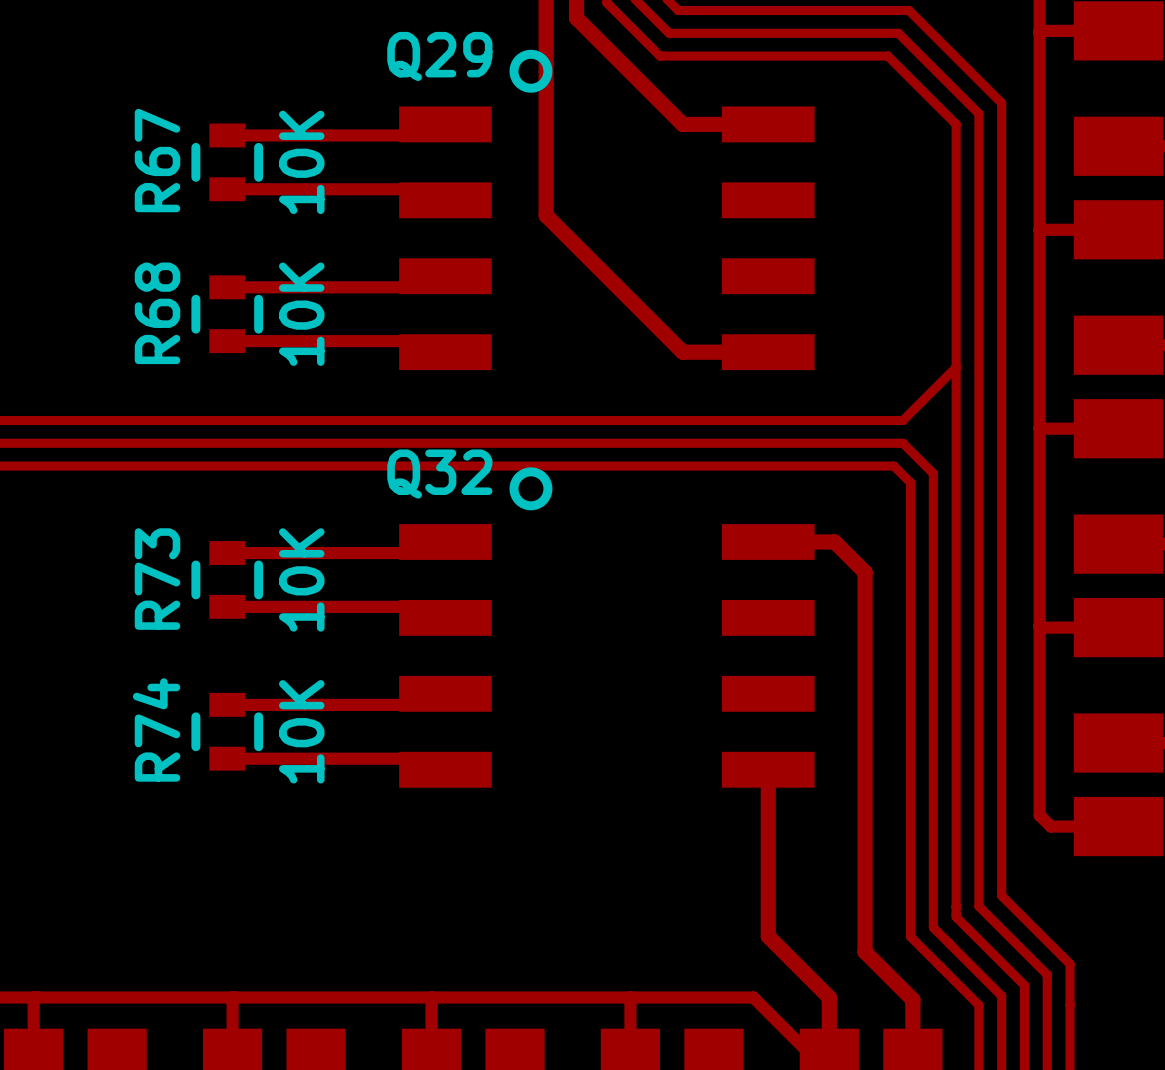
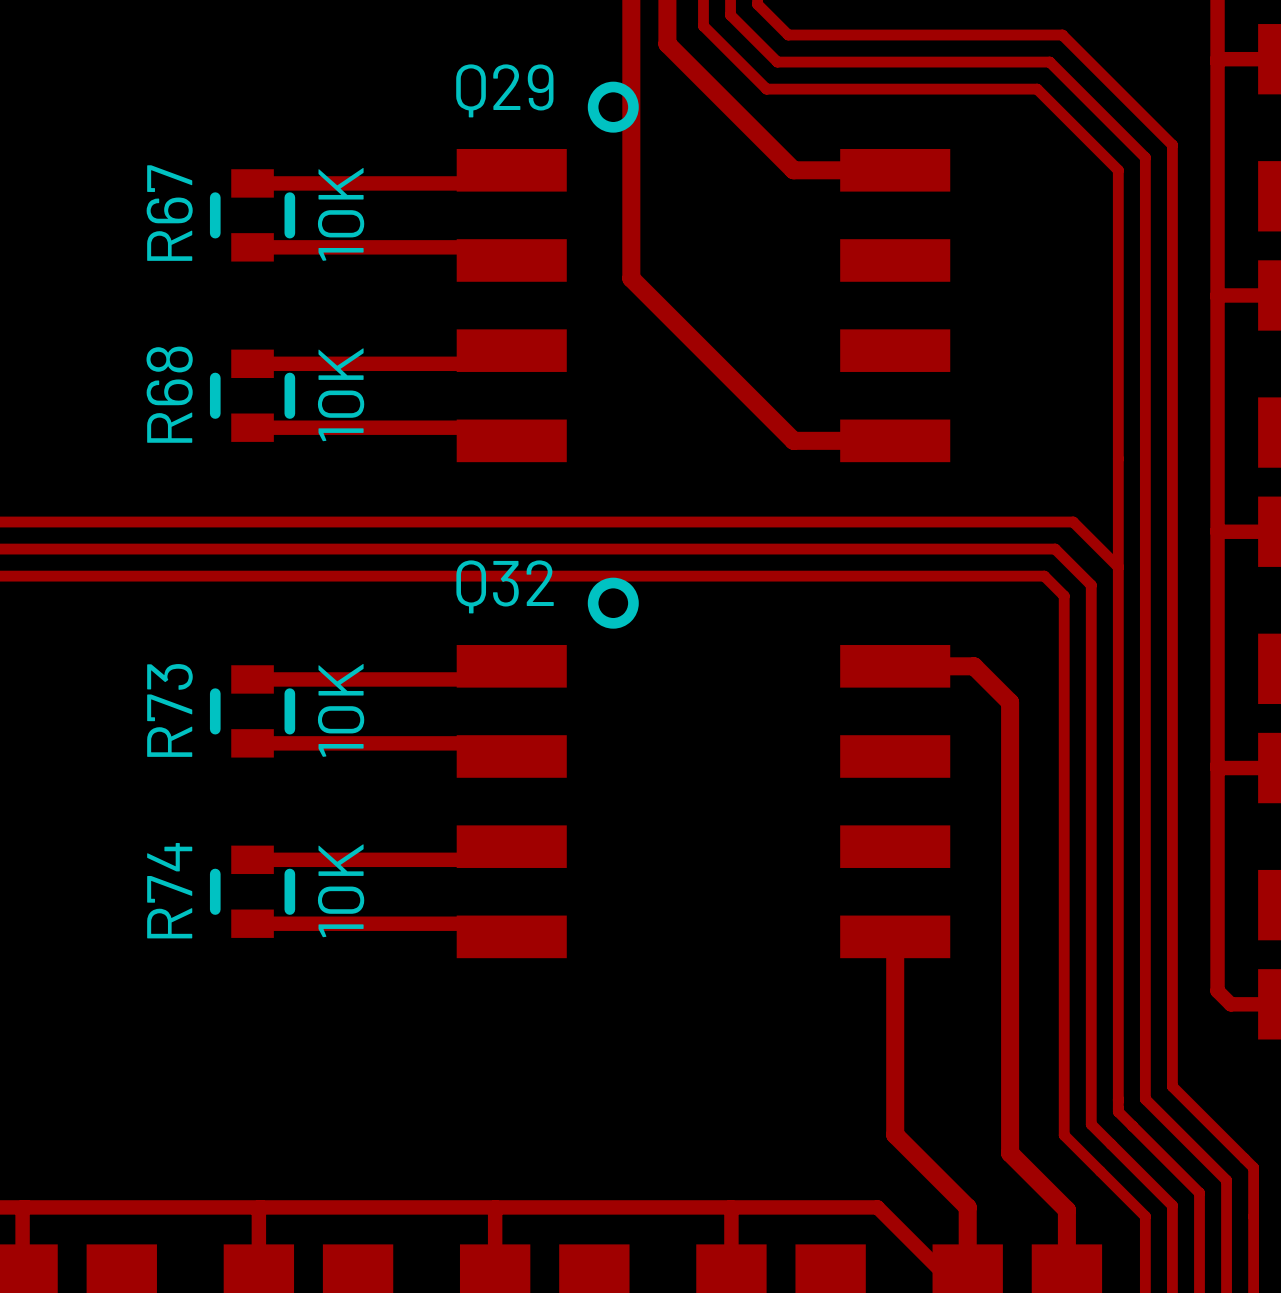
top track: (956, 367) (902, 420) -> (1118, 567) (1073, 522) (1055, 522)

